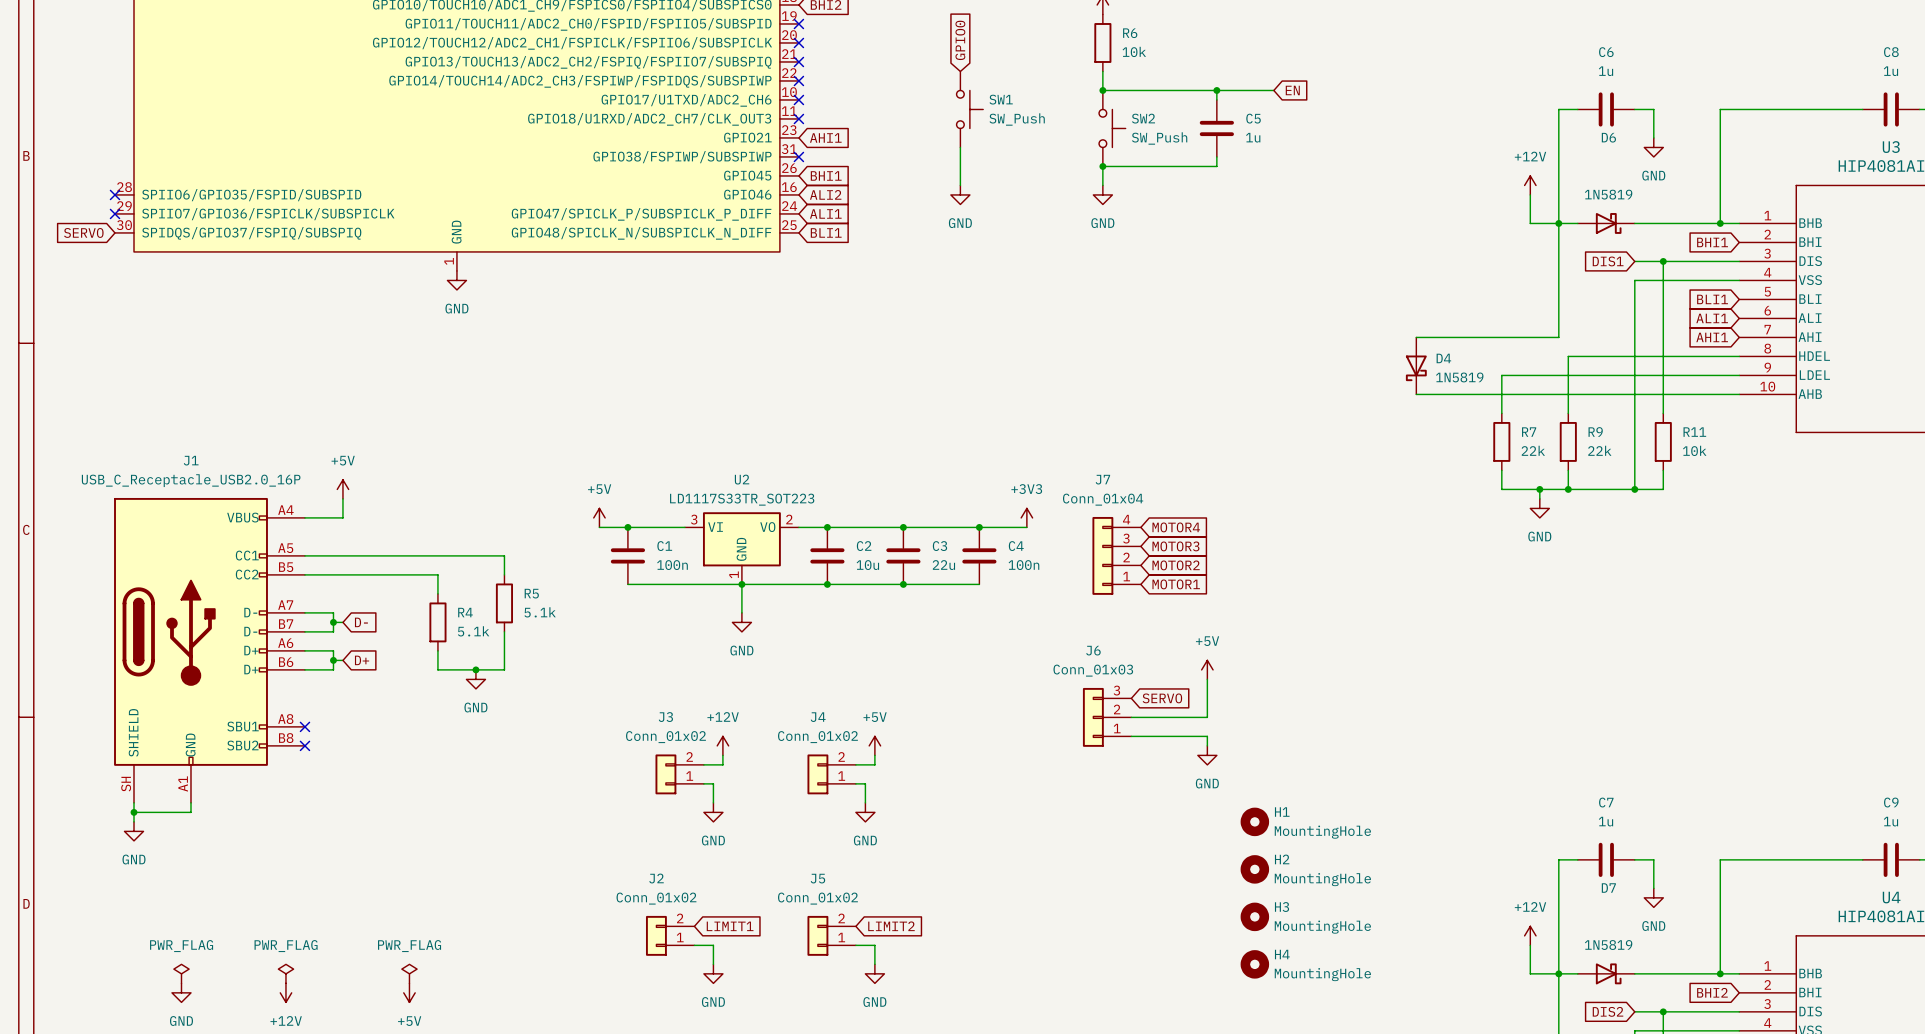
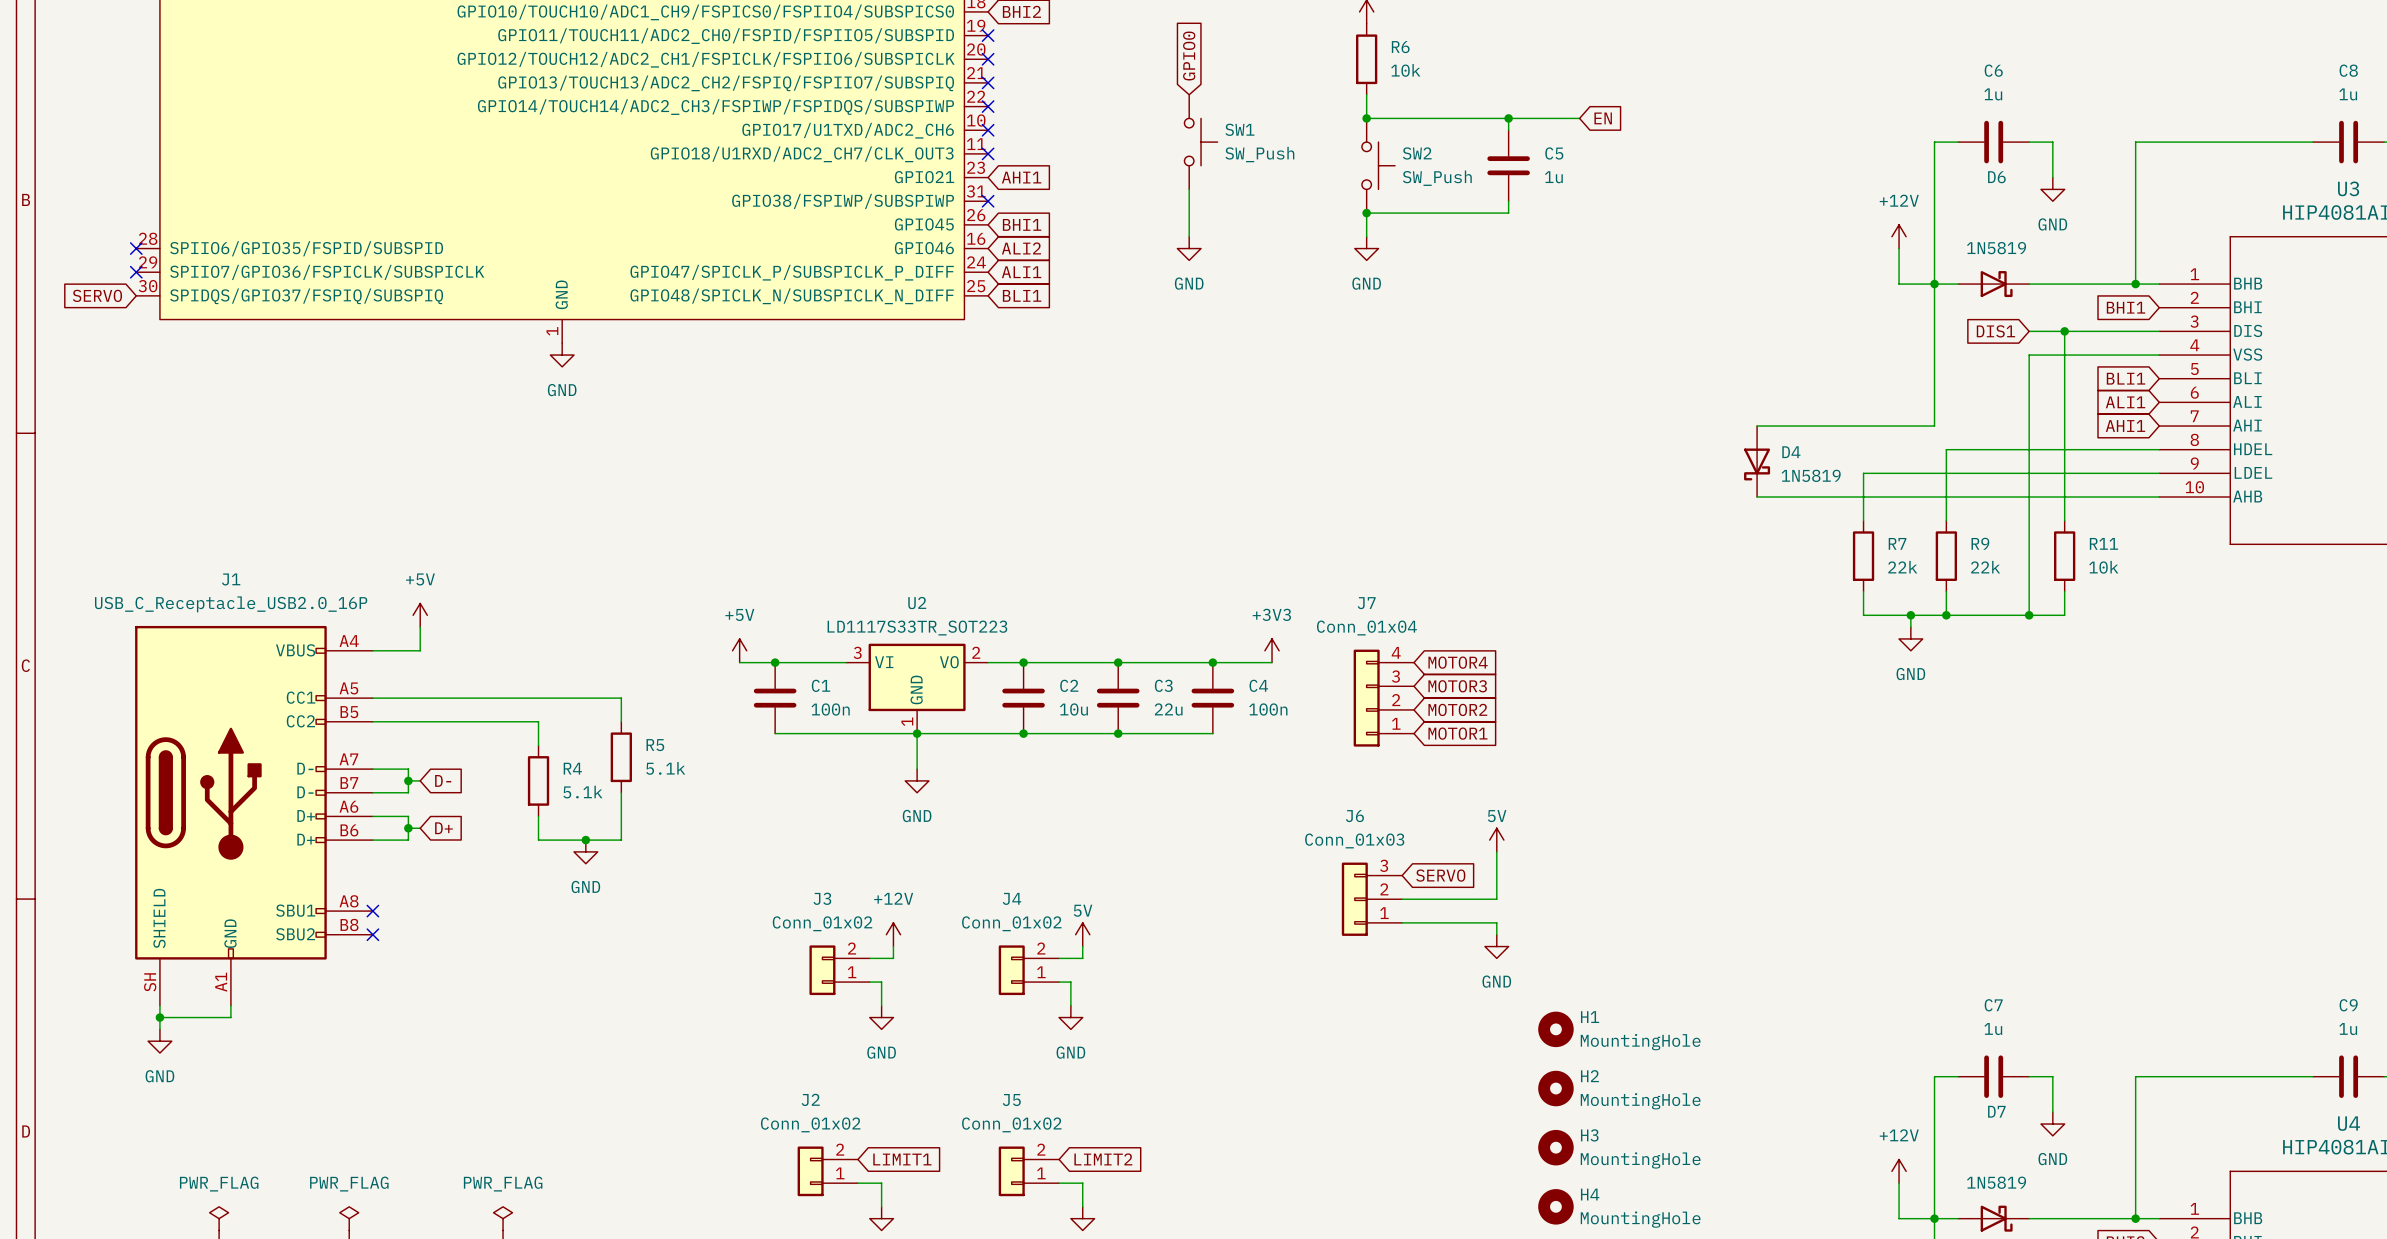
power symbol: +5V (1207, 669) -> 5V (1496, 840)
power symbol: +5V (874, 745) -> 5V (1082, 934)

